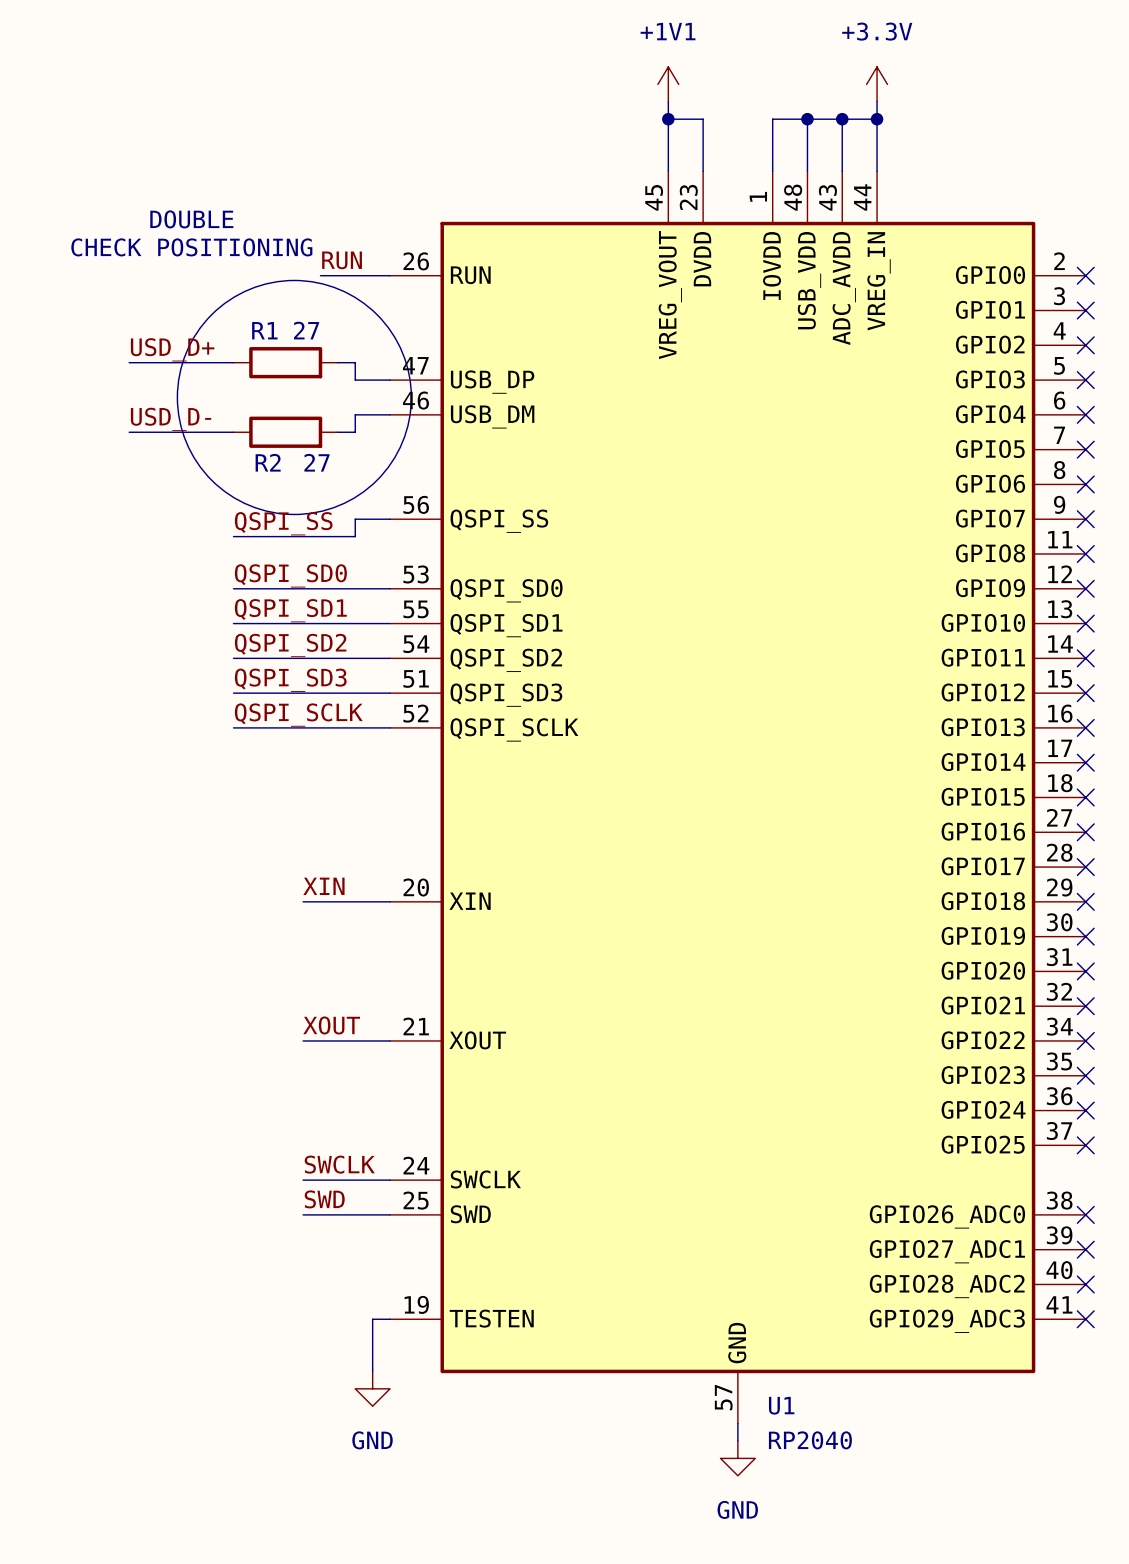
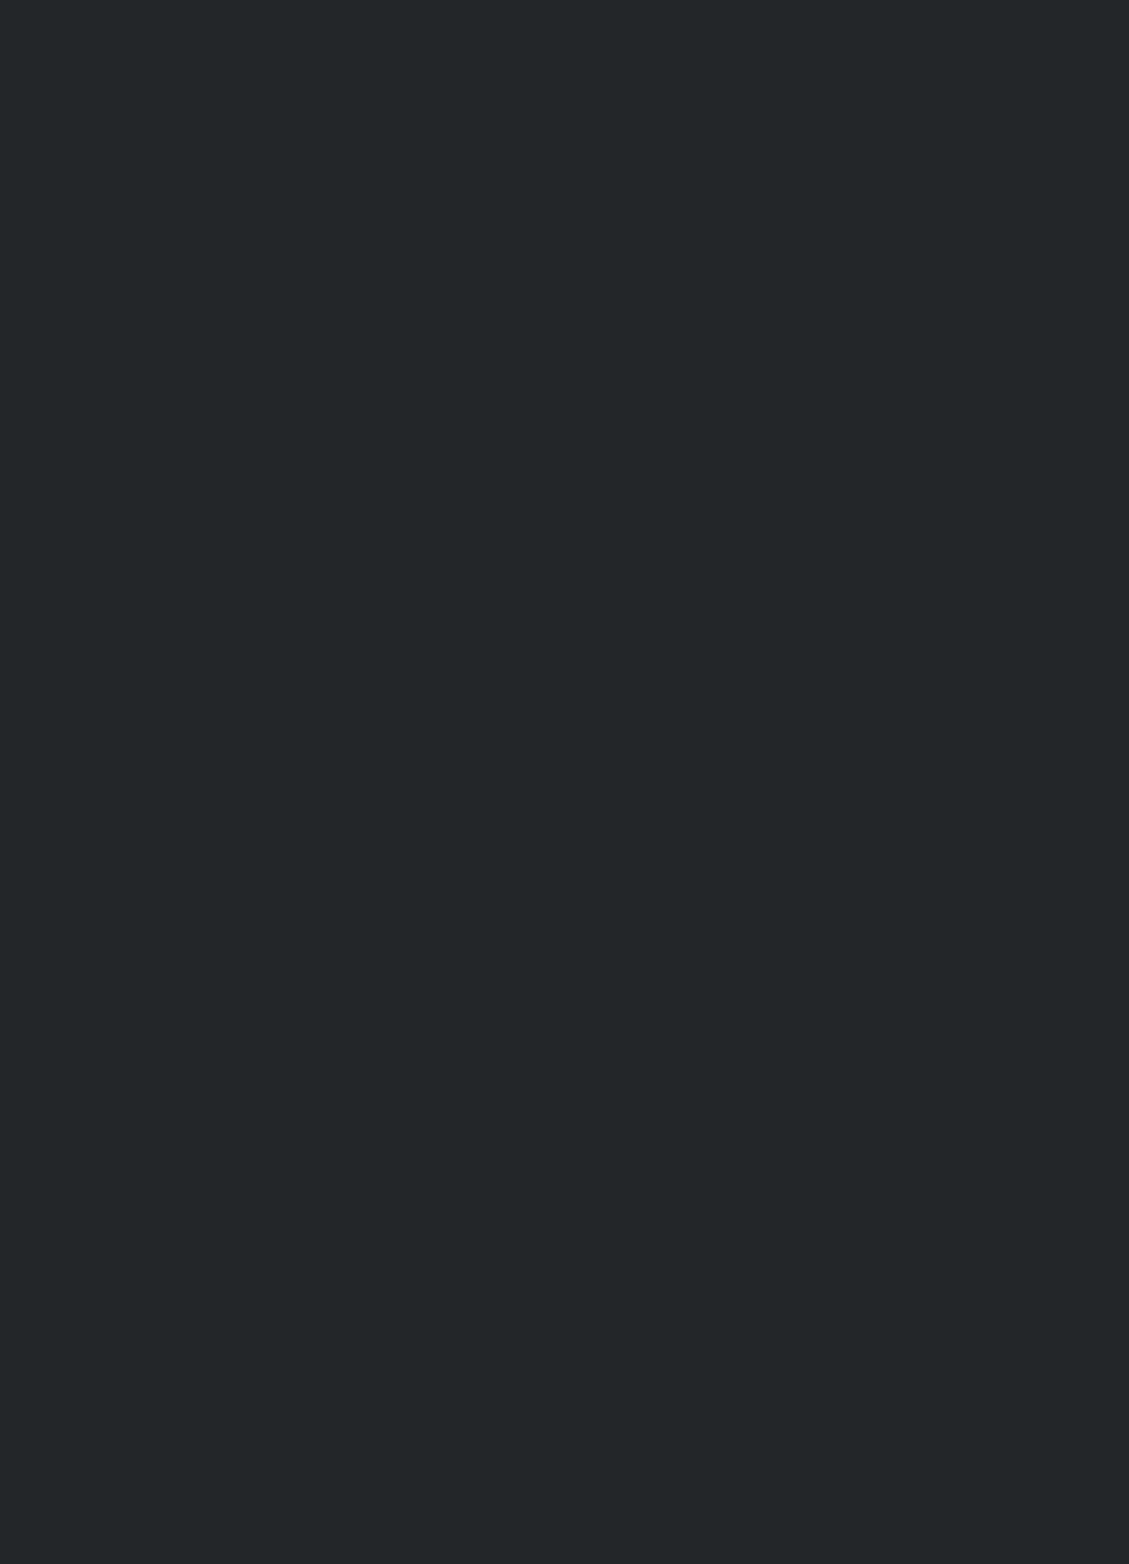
power symbol: +1V1 (668, 84) -> none
power symbol: +3.3V (877, 84) -> none
wire: (668, 101) (668, 171) -> none
wire: (877, 101) (877, 171) -> none
wire: (668, 119) (703, 119) (703, 171) -> none
junction: (668, 119) -> none
wire: (807, 119) (807, 171) -> none
junction: (807, 119) -> none
wire: (842, 119) (842, 171) -> none
junction: (842, 119) -> none
wire: (877, 119) (772, 119) (772, 171) -> none
junction: (877, 119) -> none
text: DOUBLE (191, 219) -> none
text: CHECK POSITIONING (191, 247) -> none
label: RUN (342, 260) -> none
wire: (320, 275) (390, 275) -> none
no-connect mark: (1085, 275) -> none
drawing: [177, 280, 412, 515] -> none
no-connect mark: (1085, 310) -> none
no-connect mark: (1085, 345) -> none
label: USD_D+ (172, 349) -> none
wire: (129, 362) (233, 362) -> none
R1: 27 (285, 362) -> none
wire: (337, 362) (355, 362) (355, 380) (390, 380) -> none
no-connect mark: (1085, 380) -> none
wire: (390, 414) (355, 414) (355, 432) (337, 432) -> none
no-connect mark: (1085, 414) -> none
label: USD_D- (171, 419) -> none
wire: (129, 432) (233, 432) -> none
R2: 27 (285, 432) -> none
no-connect mark: (1085, 449) -> none
no-connect mark: (1085, 484) -> none
wire: (390, 519) (355, 519) (355, 536) (233, 536) -> none
no-connect mark: (1085, 519) -> none
label: QSPI_SS (283, 523) -> none
no-connect mark: (1085, 554) -> none
label: QSPI_SD0 (290, 575) -> none
wire: (233, 588) (390, 588) -> none
no-connect mark: (1085, 588) -> none
label: QSPI_SD1 (290, 610) -> none
wire: (233, 623) (390, 623) -> none
no-connect mark: (1085, 623) -> none
label: QSPI_SD2 (290, 645) -> none
wire: (233, 658) (390, 658) -> none
no-connect mark: (1085, 658) -> none
label: QSPI_SD3 (290, 680) -> none
wire: (233, 693) (390, 693) -> none
no-connect mark: (1085, 693) -> none
label: QSPI_SCLK (298, 715) -> none
wire: (233, 727) (390, 727) -> none
no-connect mark: (1085, 727) -> none
no-connect mark: (1085, 762) -> none
U1: RP2040 (737, 797) -> none
no-connect mark: (1085, 797) -> none
no-connect mark: (1085, 832) -> none
no-connect mark: (1085, 867) -> none
label: XIN (323, 886) -> none
wire: (303, 901) (390, 901) -> none
no-connect mark: (1085, 901) -> none
no-connect mark: (1085, 936) -> none
no-connect mark: (1085, 971) -> none
no-connect mark: (1085, 1006) -> none
label: XOUT (331, 1025) -> none
wire: (303, 1040) (390, 1040) -> none
no-connect mark: (1085, 1040) -> none
no-connect mark: (1085, 1075) -> none
no-connect mark: (1085, 1110) -> none
no-connect mark: (1085, 1145) -> none
label: SWCLK (339, 1164) -> none
wire: (303, 1180) (390, 1180) -> none
label: SWD (324, 1199) -> none
wire: (303, 1214) (390, 1214) -> none
no-connect mark: (1085, 1214) -> none
no-connect mark: (1085, 1249) -> none
no-connect mark: (1085, 1284) -> none
wire: (390, 1319) (372, 1319) (372, 1371) -> none
no-connect mark: (1085, 1319) -> none
power symbol: GND (372, 1388) -> none
wire: (737, 1423) (737, 1441) -> none
power symbol: GND (737, 1458) -> none

